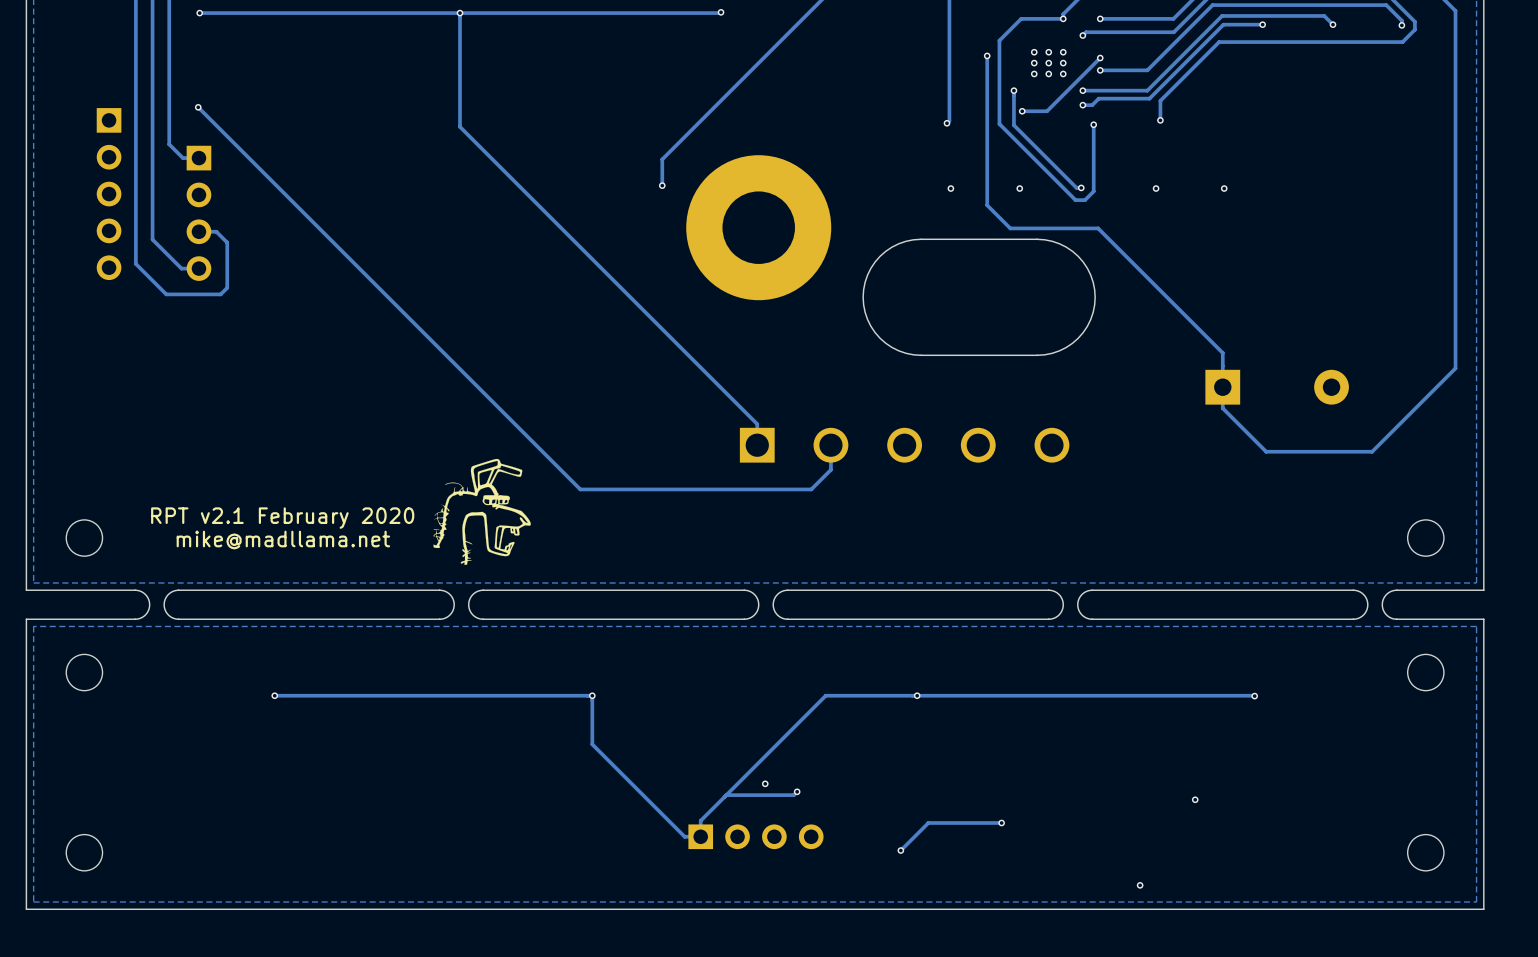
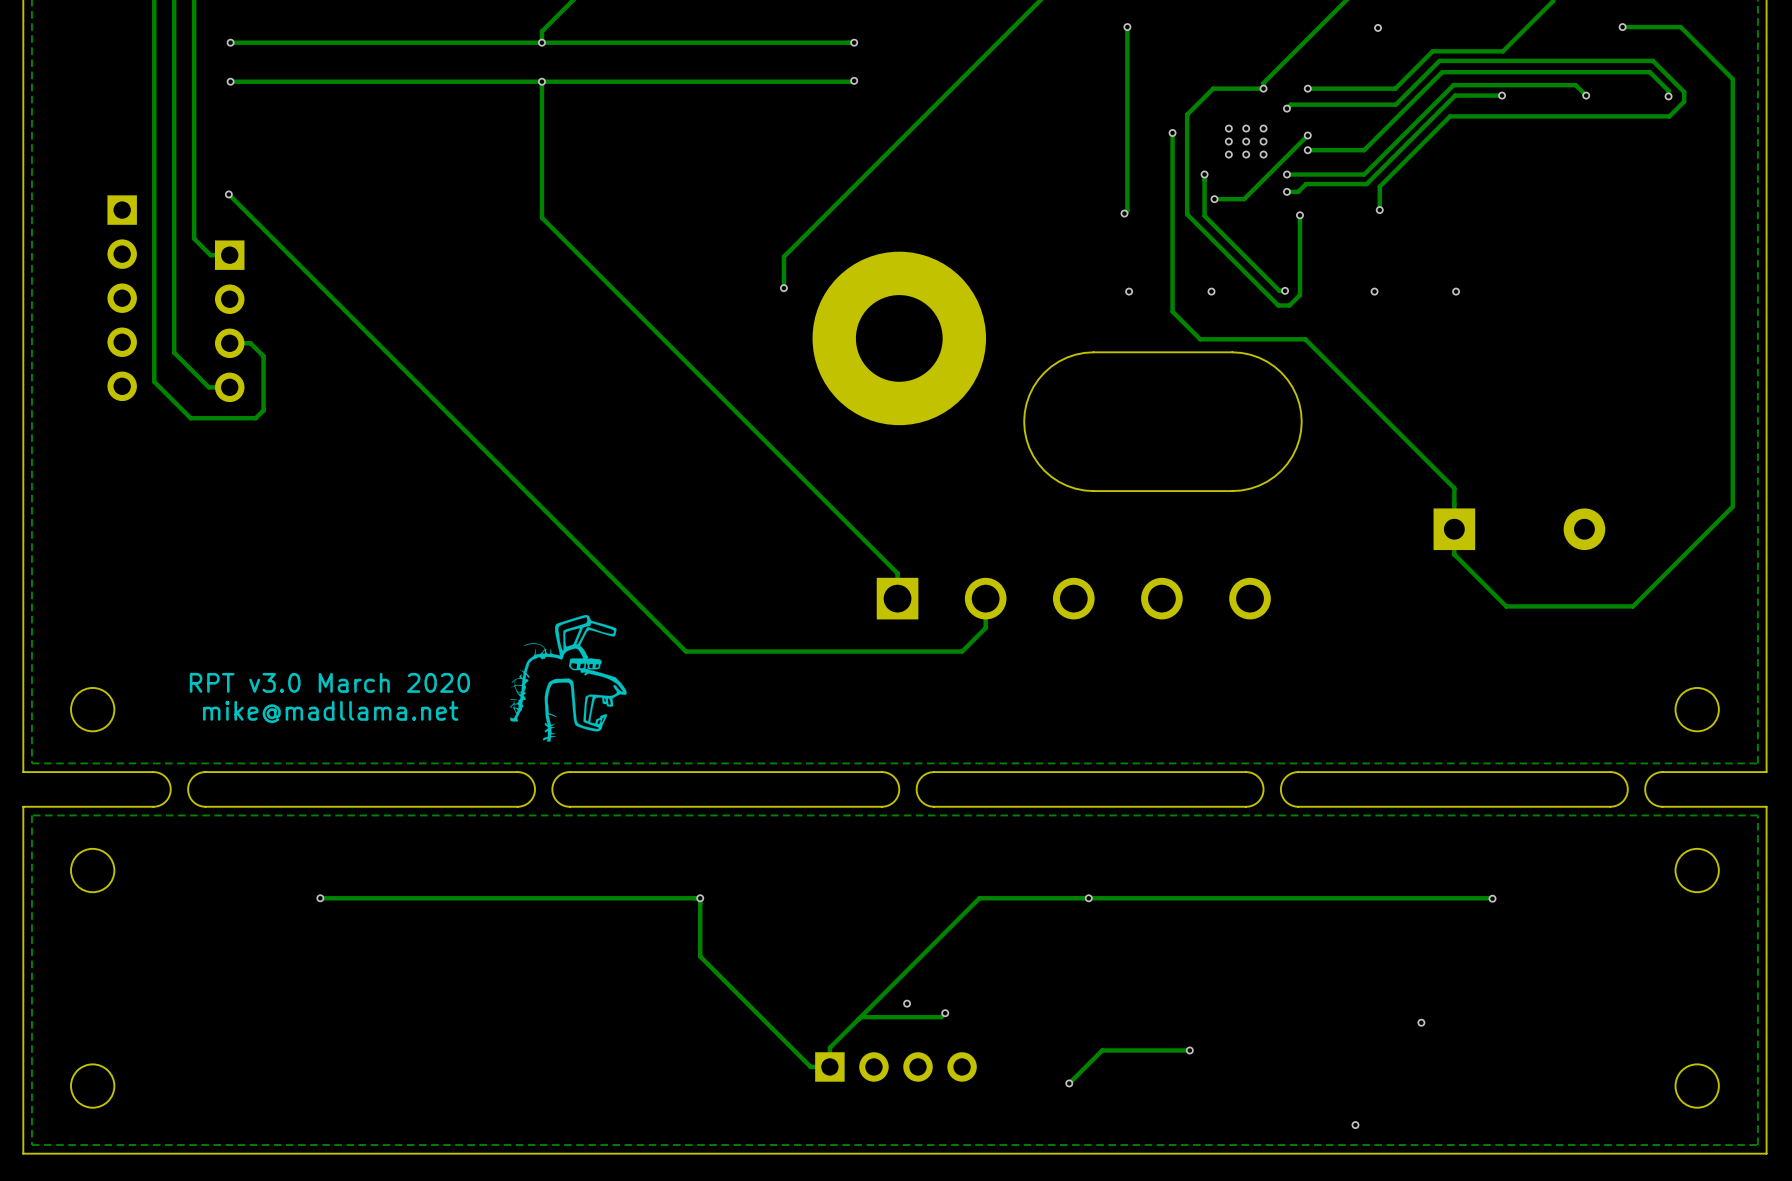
text: RPT v2.1 February 2020 (282, 518) -> RPT v3.0 March 2020 (329, 682)

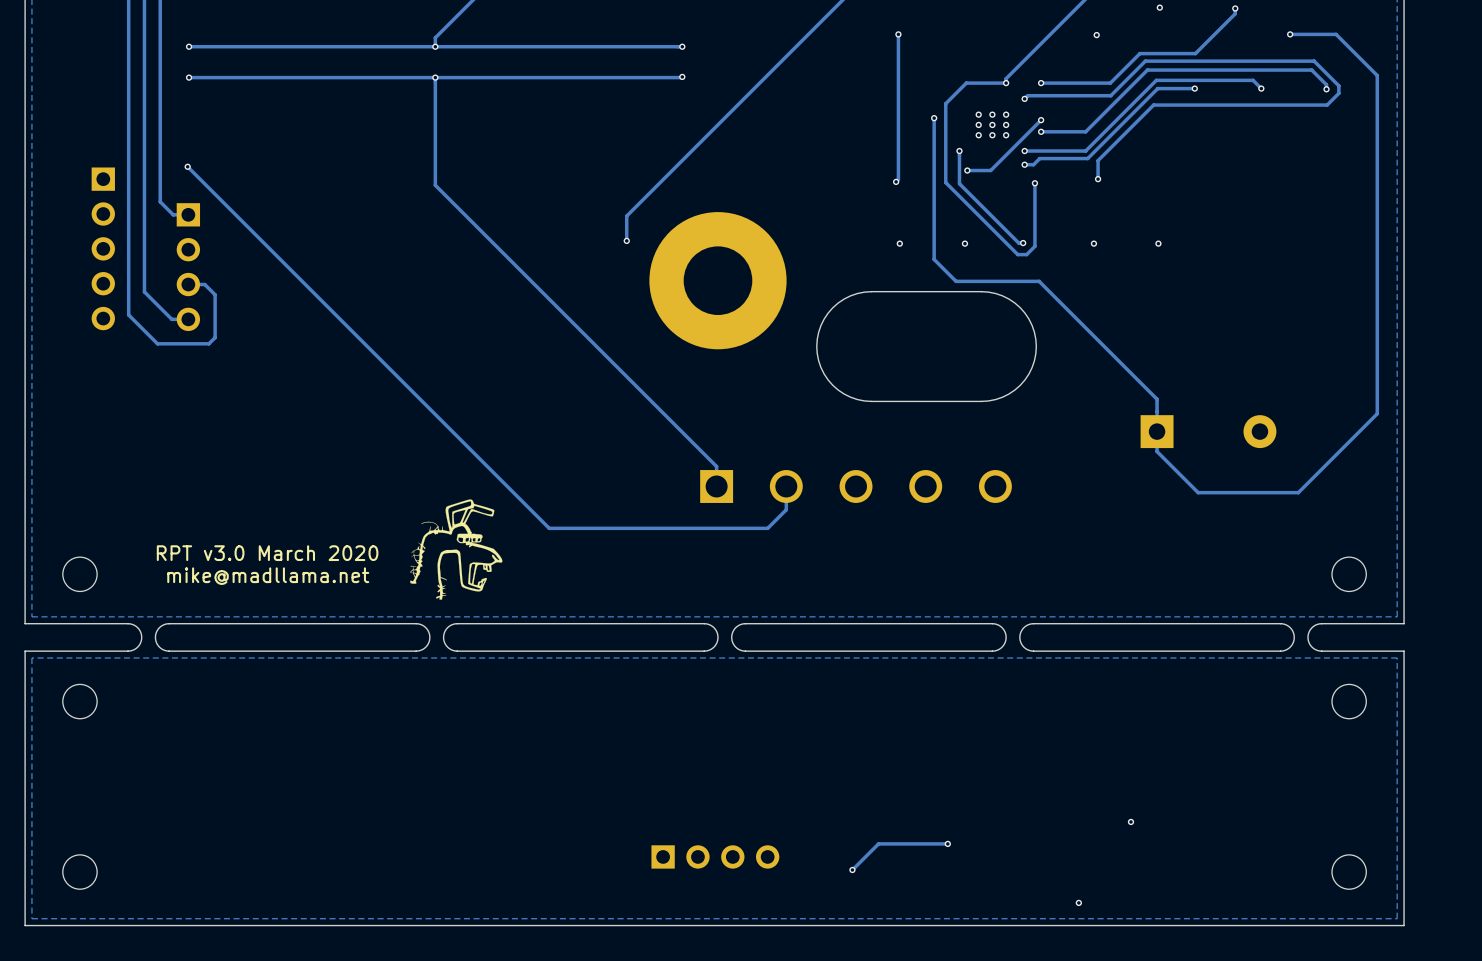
track: (320, 898) (700, 898) (700, 956) (810, 1066) (829, 1066) (829, 1047) (858, 1019) -> none
via: (320, 898) -> none
via: (700, 898) -> none
via: (1088, 898) -> none
track: (1492, 898) (979, 898) (858, 1019) -> none
via: (1492, 898) -> none
via: (907, 1003) -> none
track: (945, 1013) (941, 1017) (860, 1017) (858, 1019) -> none
via: (945, 1013) -> none

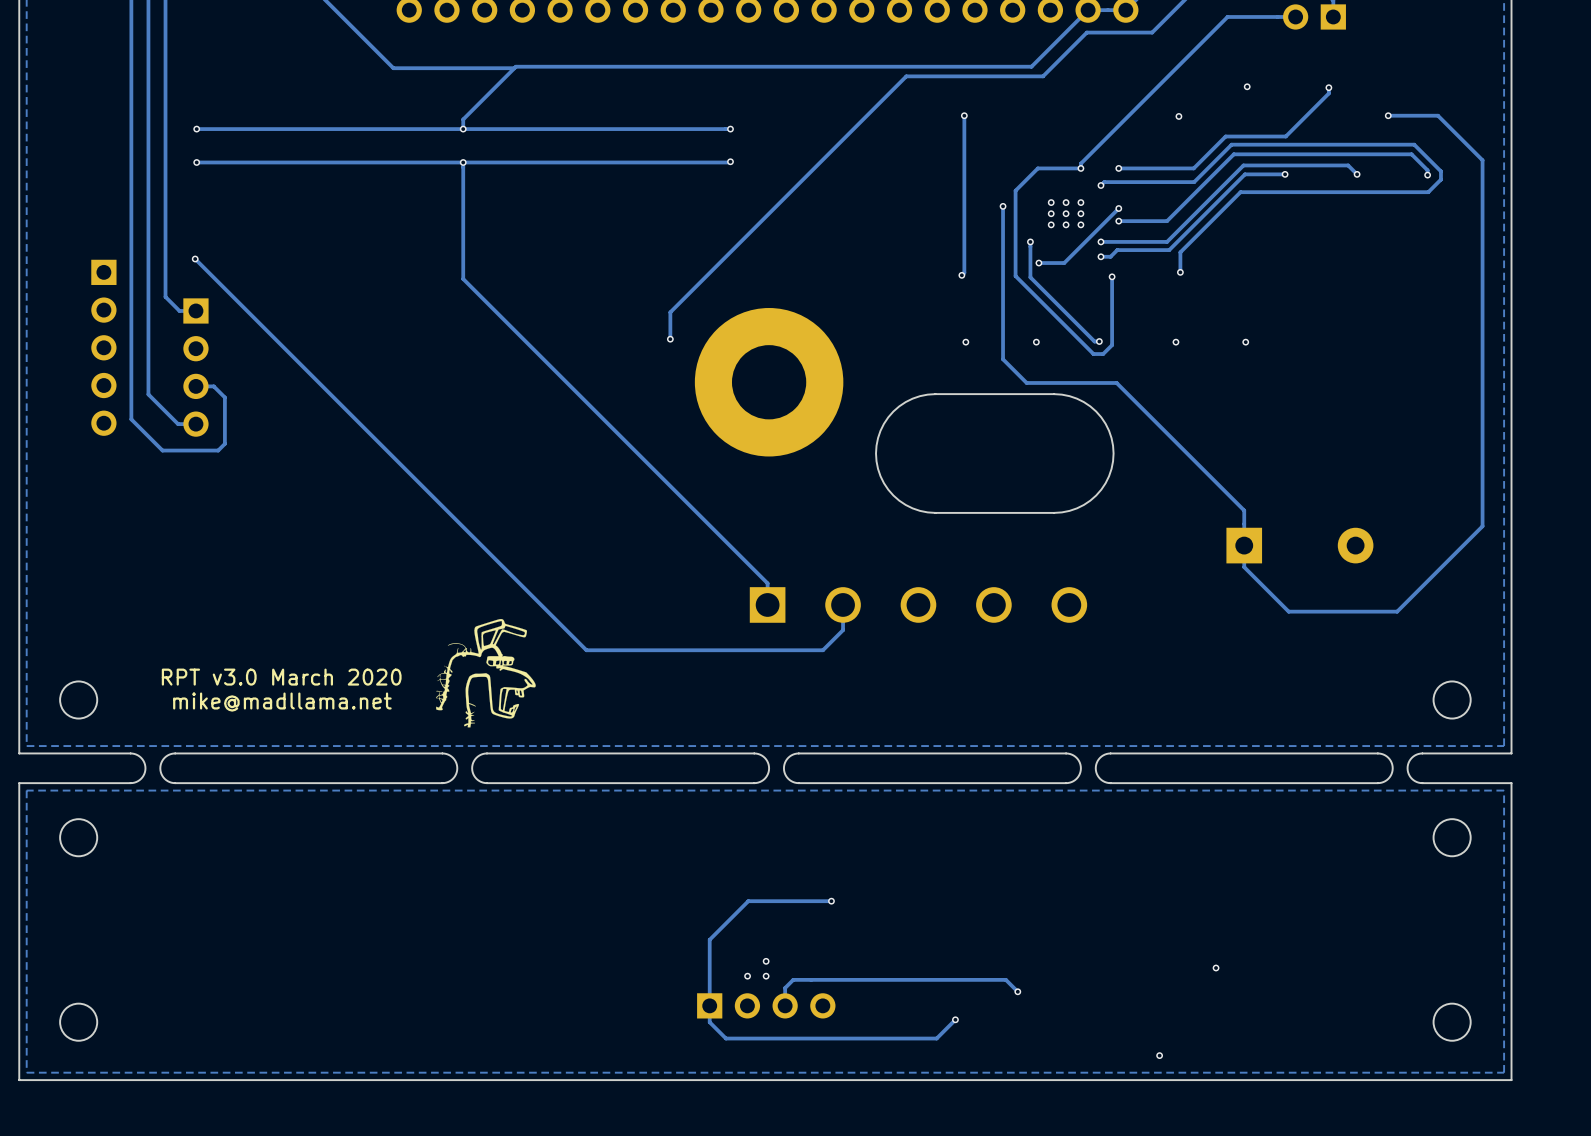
track: none -> (831, 901) (748, 901) (709, 939) (709, 1022) (725, 1038) (936, 1038) (955, 1019)
via: none -> (831, 901)
via: none -> (766, 961)
via: none -> (747, 976)
via: none -> (766, 976)
track: (947, 843) (878, 843) (852, 869) -> (1017, 991) (1005, 979) (793, 979) (785, 988) (785, 1005)
via position: (852, 869) -> (955, 1019)

